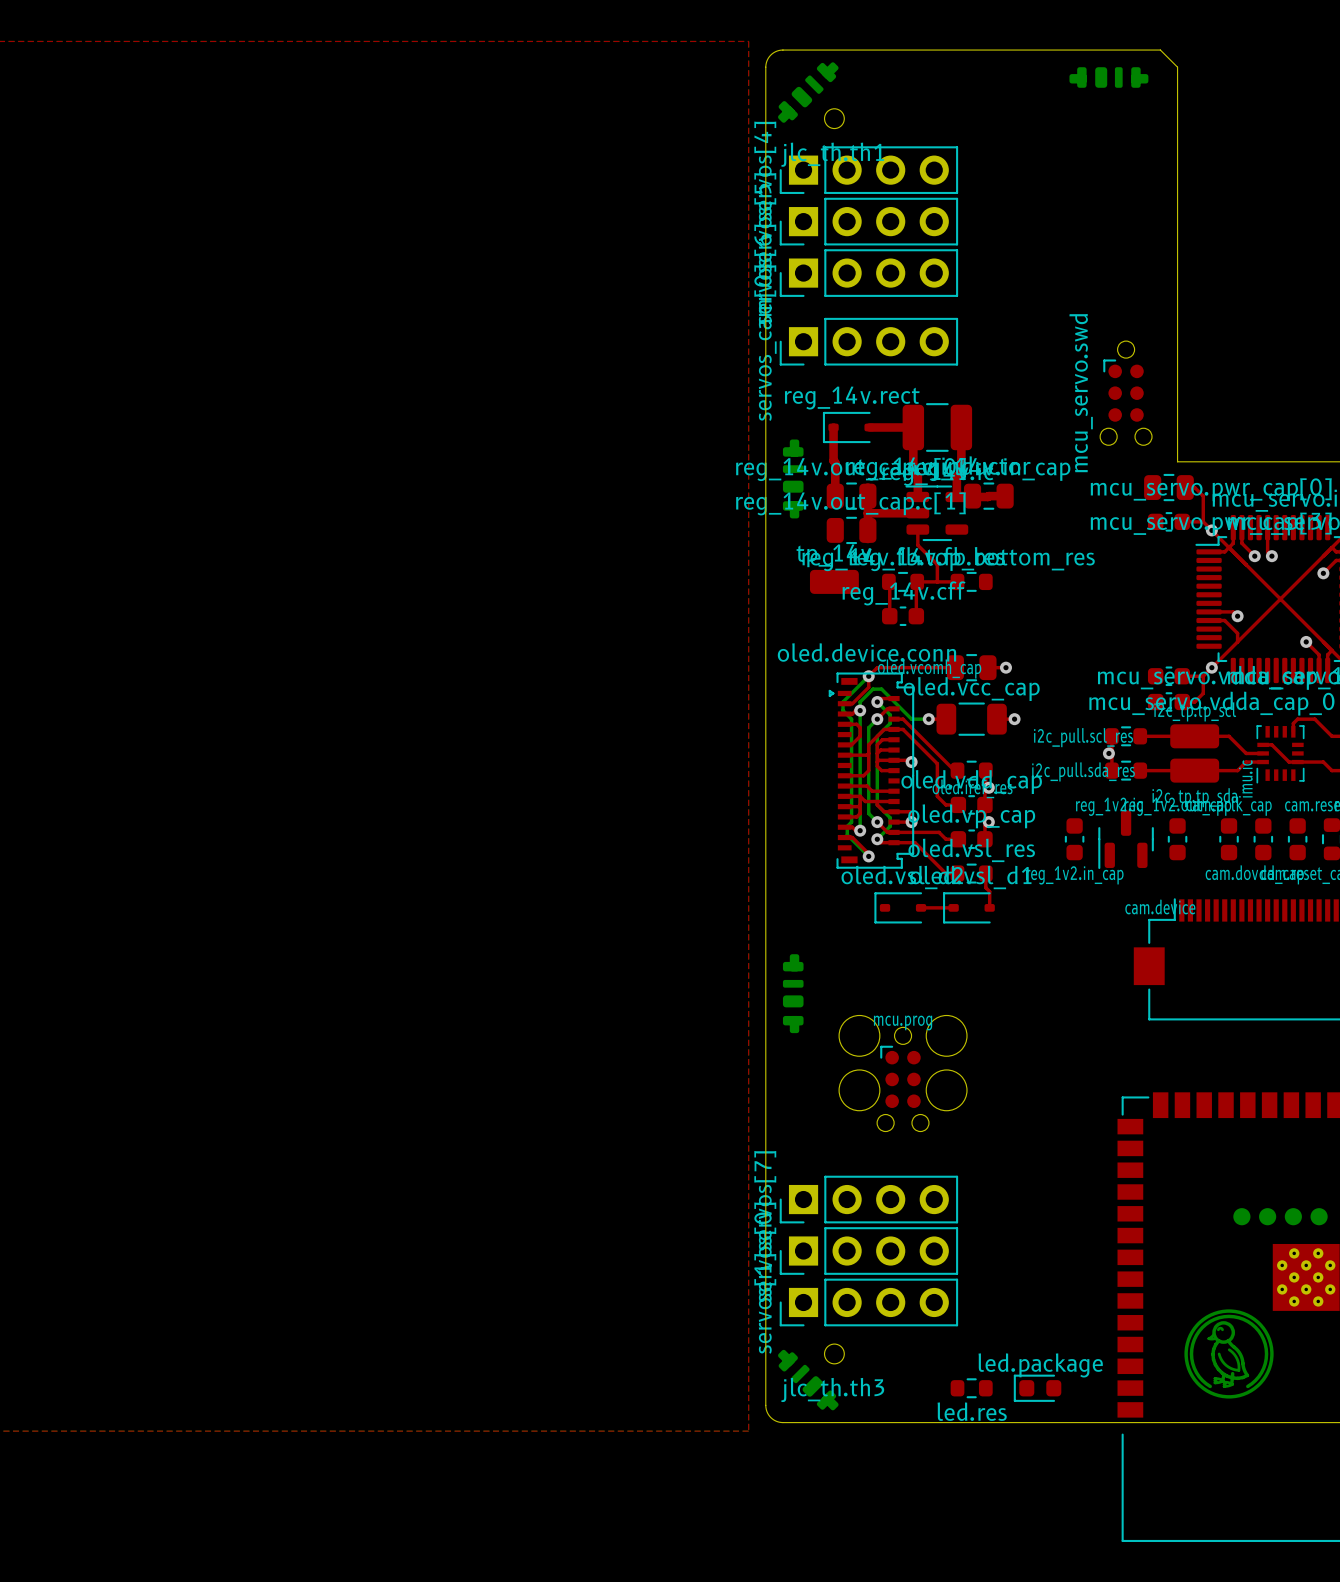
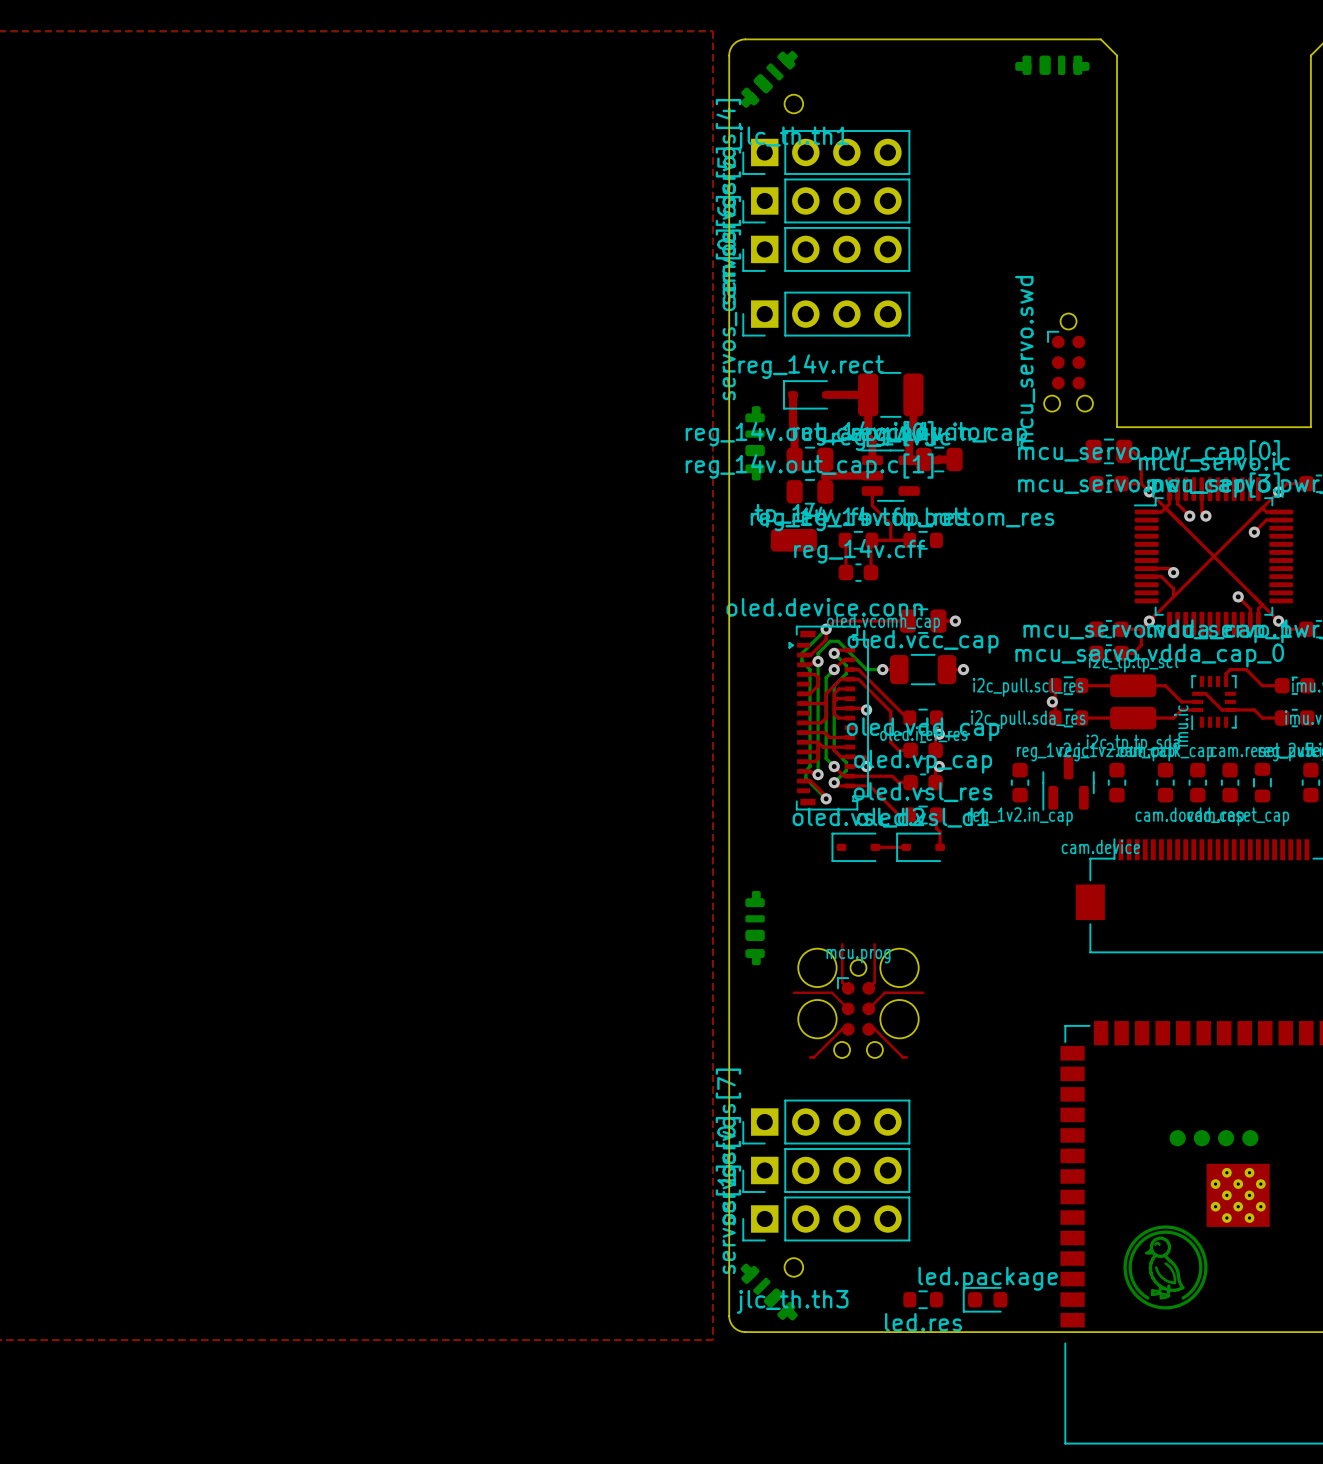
top track: none -> (842, 944) (842, 982) (848, 988)
top track: none -> (874, 944) (874, 982) (868, 988)
top track: none -> (793, 992) (832, 992) (848, 1008)
top track: none -> (923, 992) (884, 992) (868, 1008)
top track: none -> (848, 1029) (841, 1029) (813, 1057) (810, 1057)
top track: none -> (868, 1029) (875, 1029) (902, 1057) (906, 1057)

